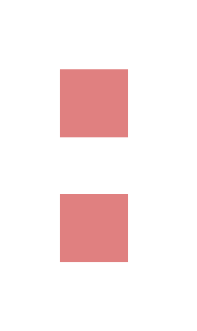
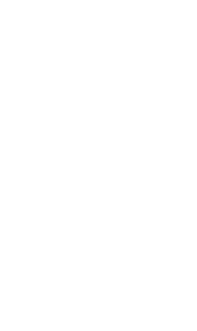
part: (93, 165) -> none

